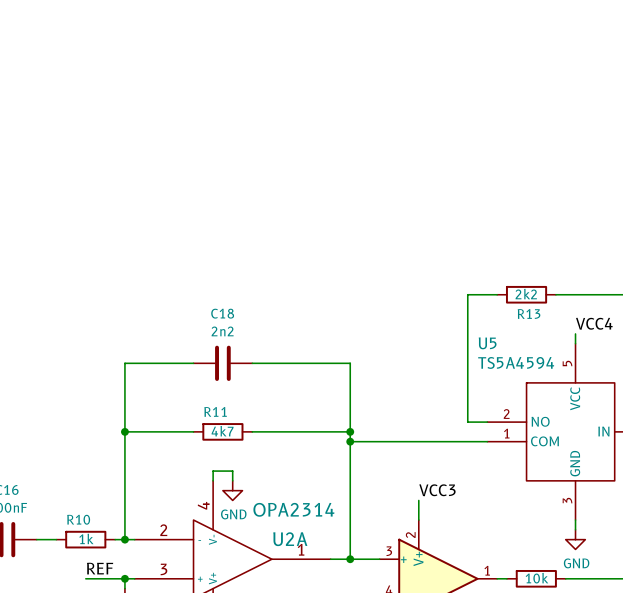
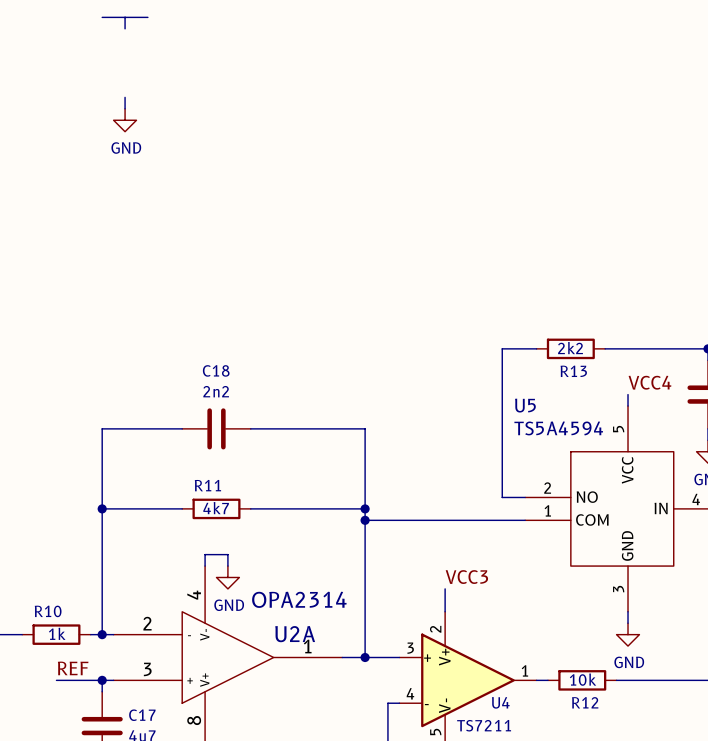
wire: none -> (102, 17) (147, 17)
wire: none -> (125, 17) (125, 28)
wire: none -> (125, 97) (125, 108)
power symbol: none -> GND (125, 120)

